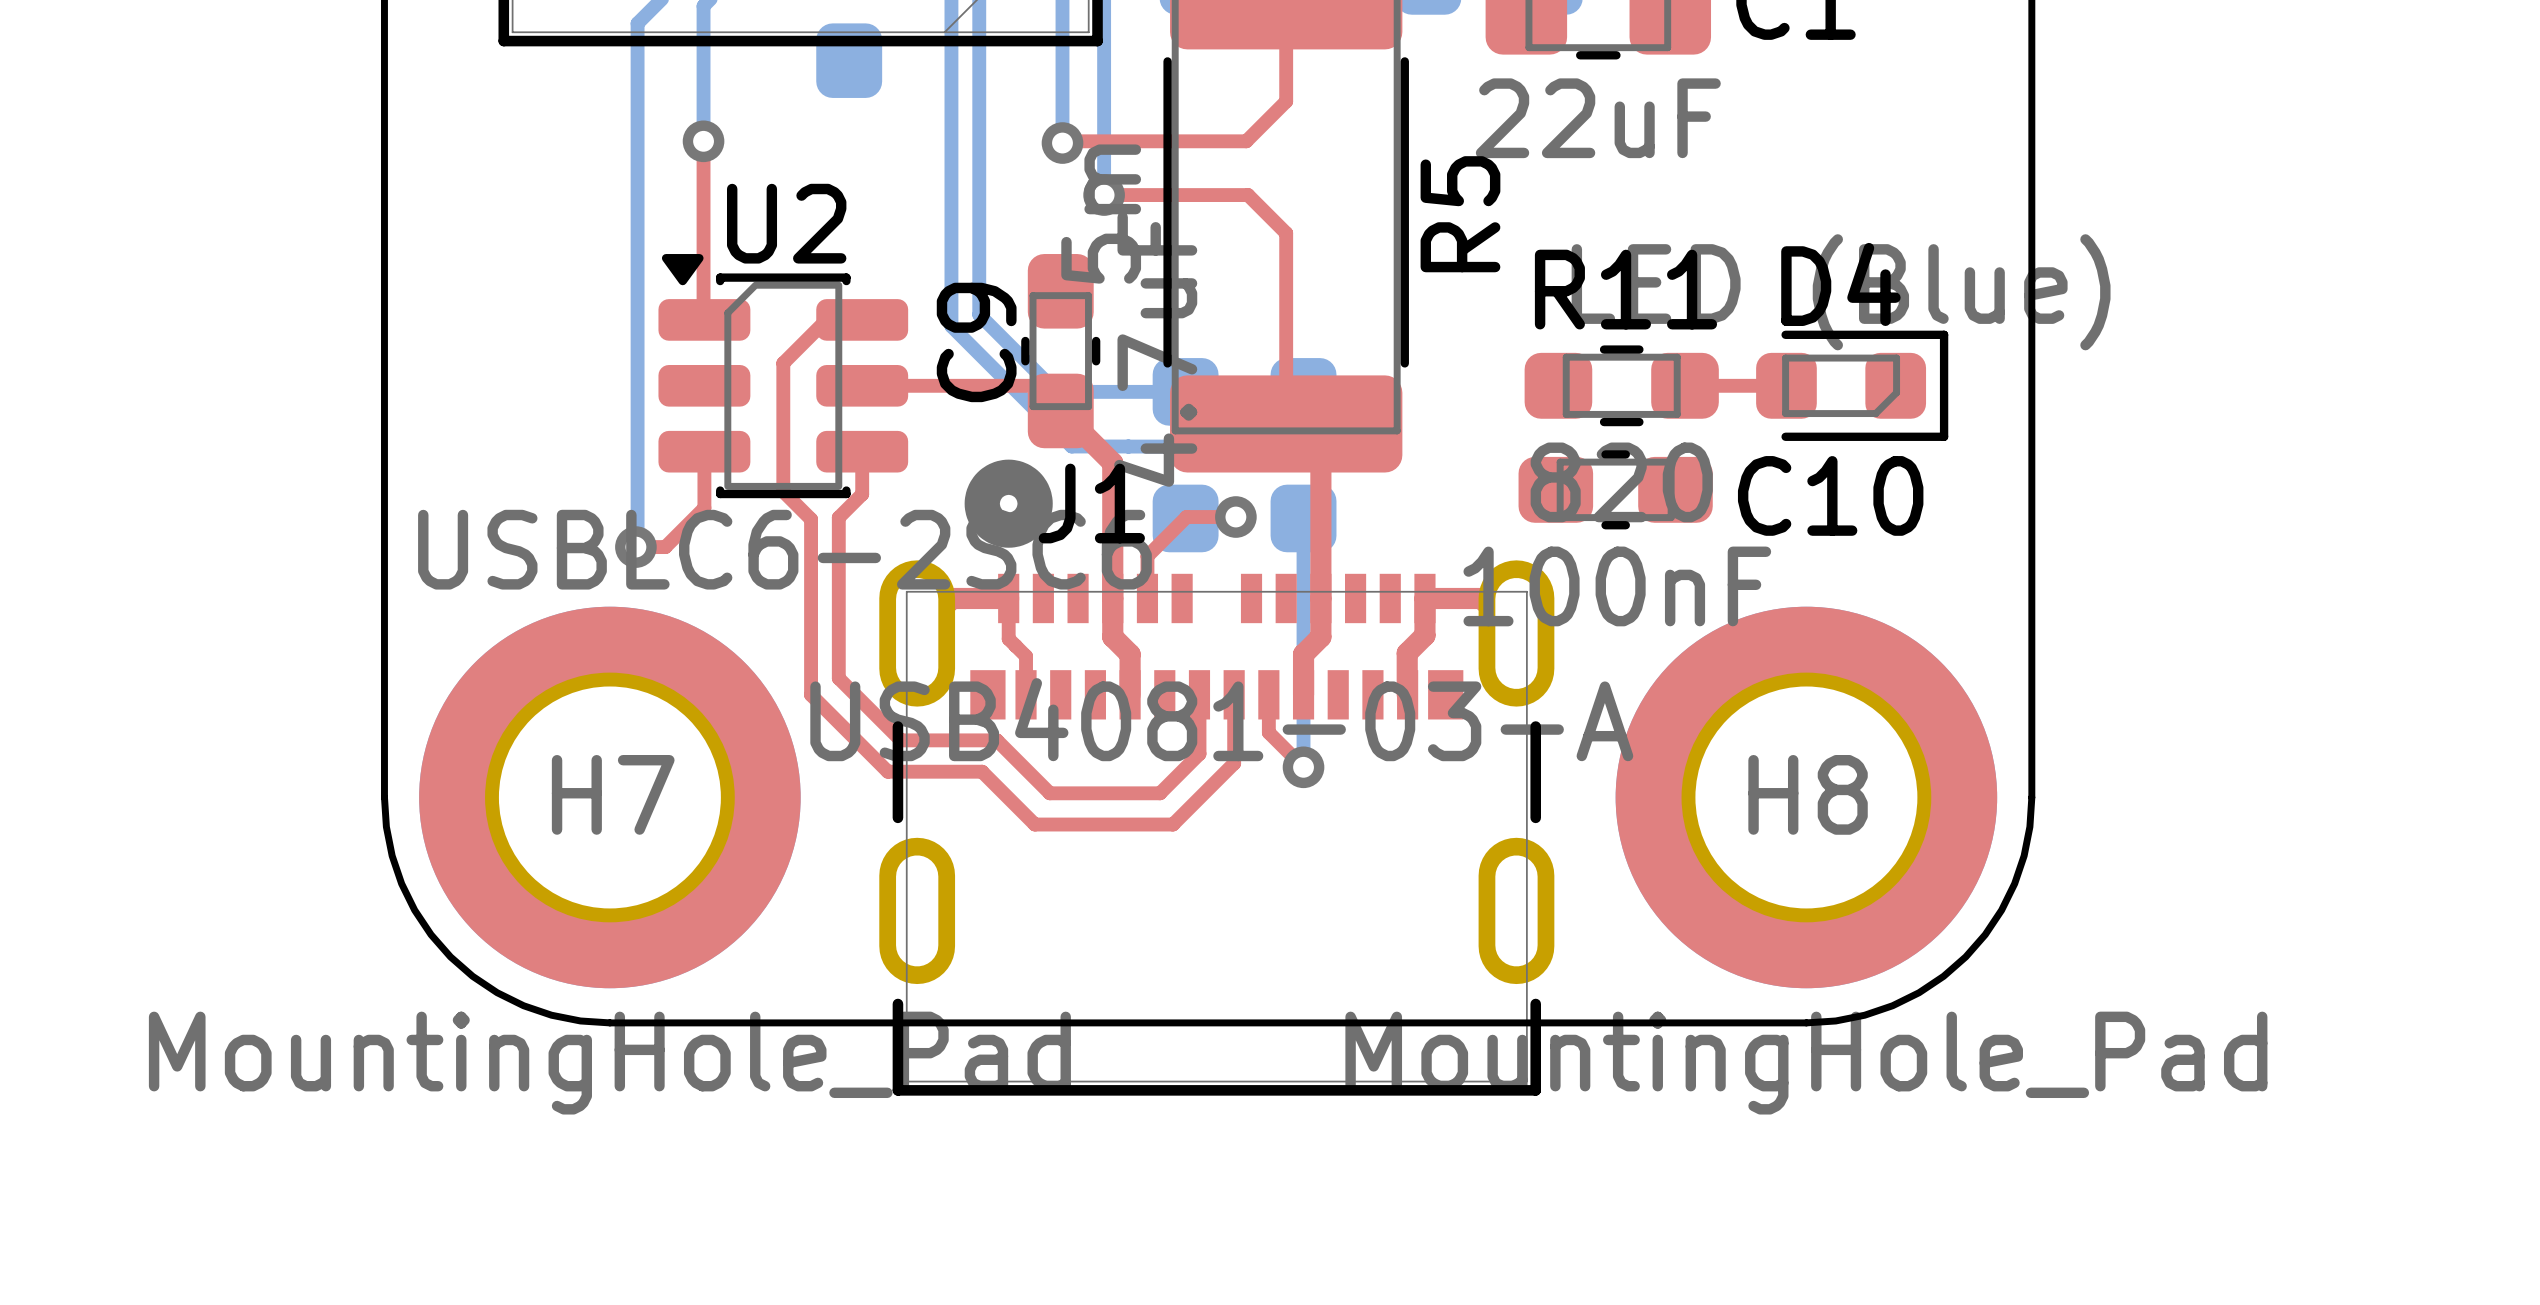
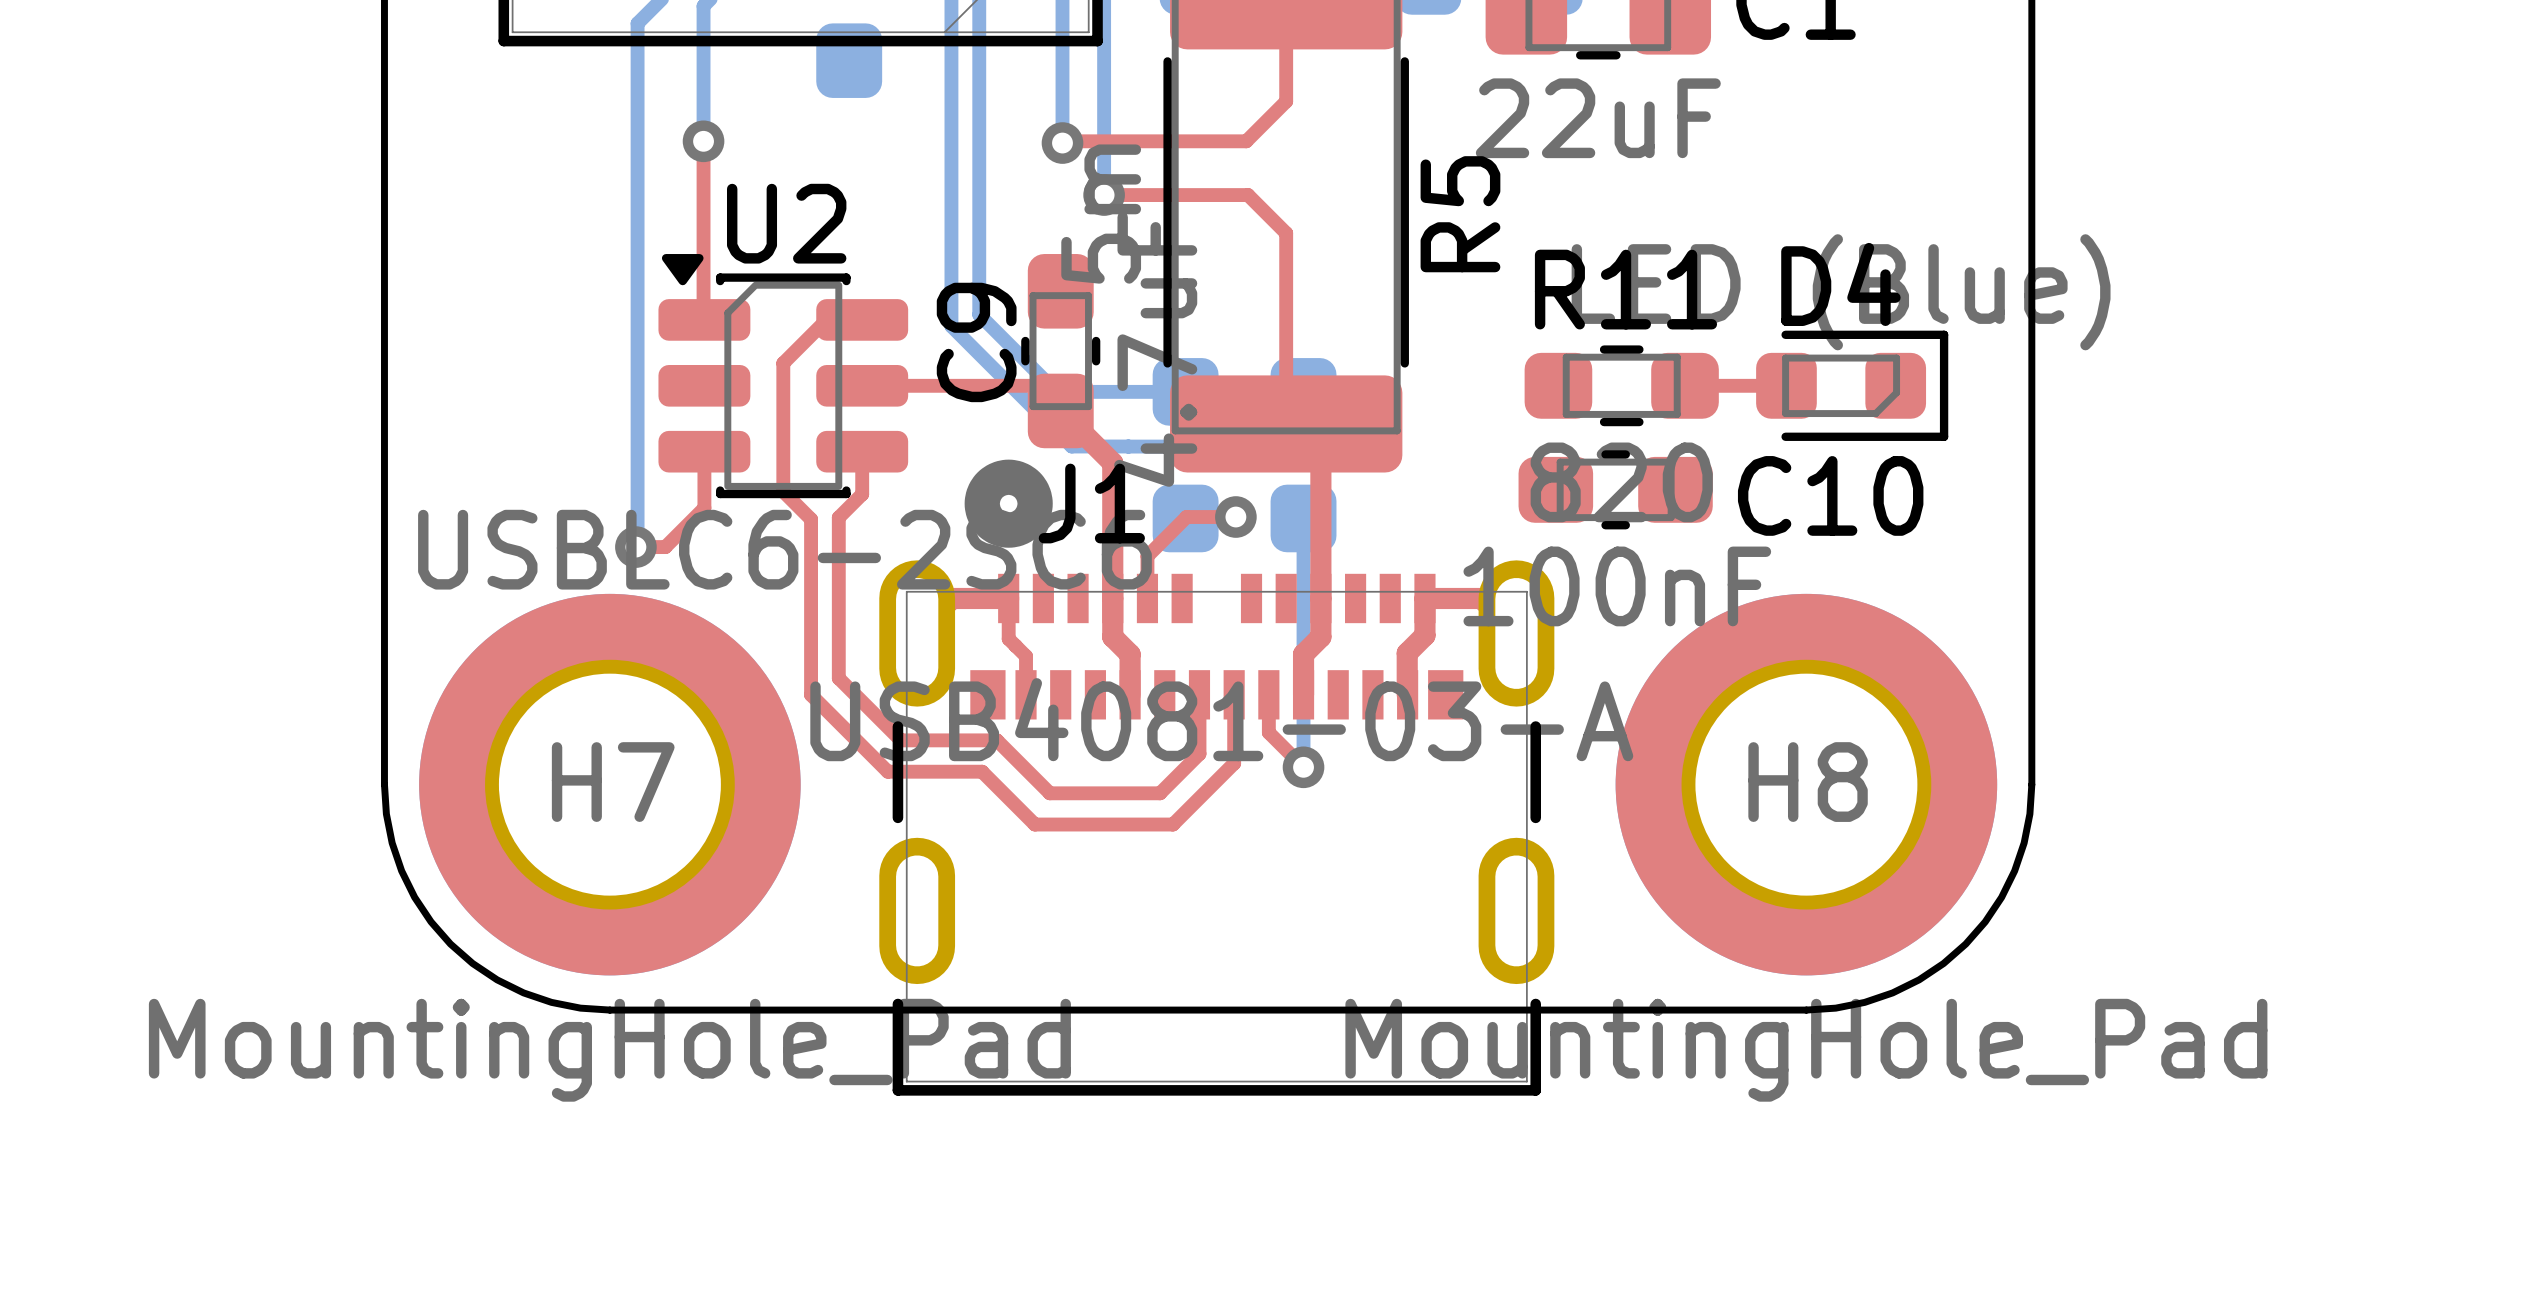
board edge: (384, 784) (386, 826) (392, 855) (401, 883) (414, 910) (431, 934) (450, 956) (472, 976) (497, 992) (523, 1005) (551, 1015) (580, 1020) (609, 1022) (1806, 1022) (1835, 1020) (1864, 1015) (1892, 1005) (1919, 992) (1943, 976) (1965, 956) (1985, 934) (2001, 910) (2014, 883) (2024, 855) (2029, 826) (2031, 784) -> (384, 784) (386, 814) (392, 842) (401, 870) (414, 897) (431, 921) (450, 944) (472, 963) (497, 979) (523, 992) (551, 1002) (580, 1008) (609, 1010) (1806, 1010) (1835, 1008) (1864, 1002) (1892, 992) (1919, 979) (1943, 963) (1965, 944) (1985, 921) (2001, 897) (2014, 870) (2024, 842) (2029, 814) (2031, 784)
H7 position: (609, 797) -> (609, 784)
H8 position: (1806, 797) -> (1806, 784)

